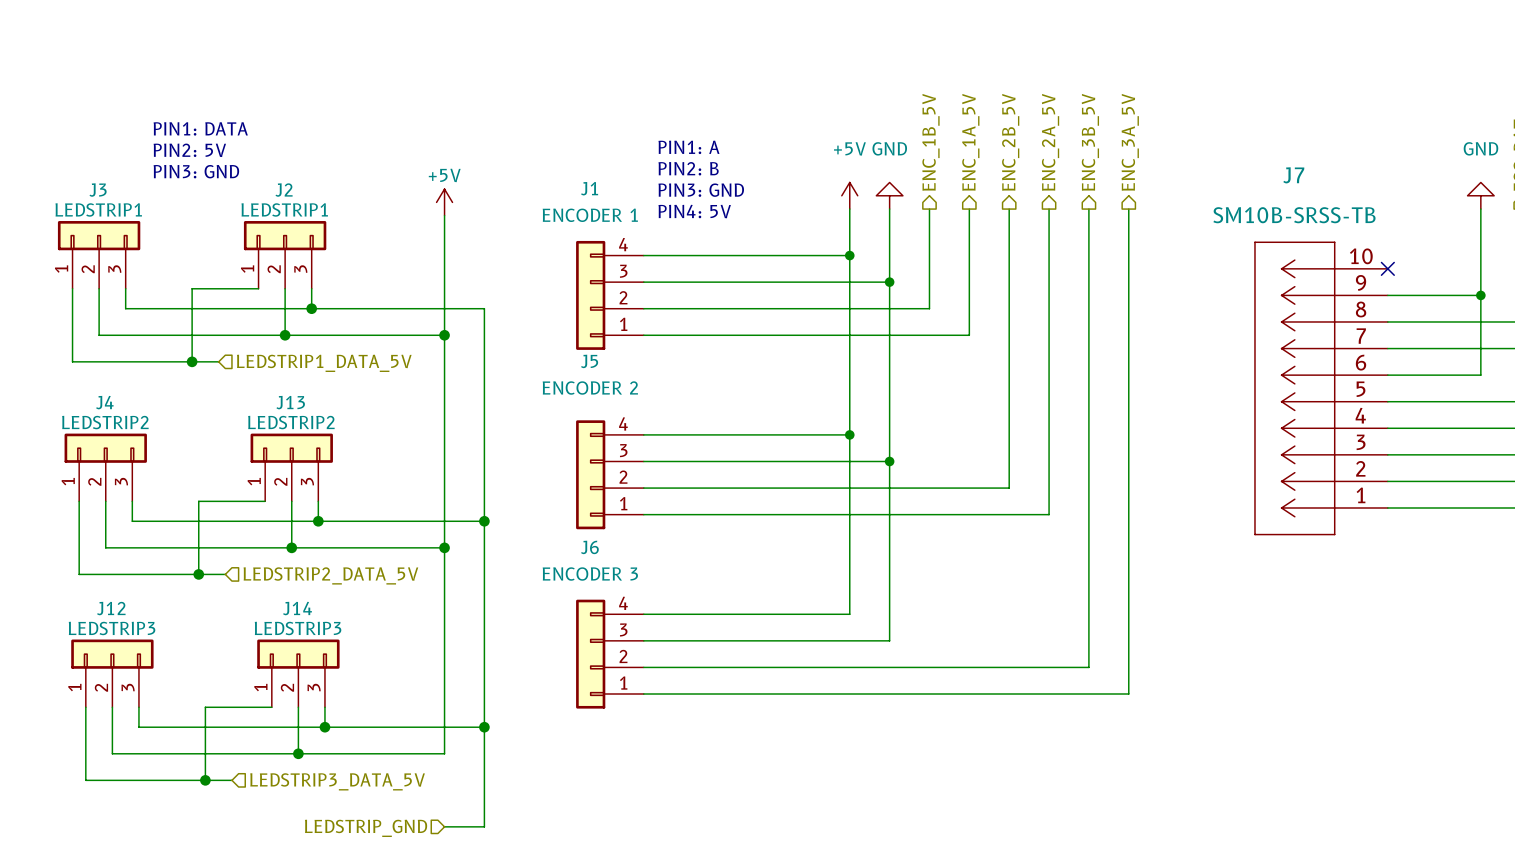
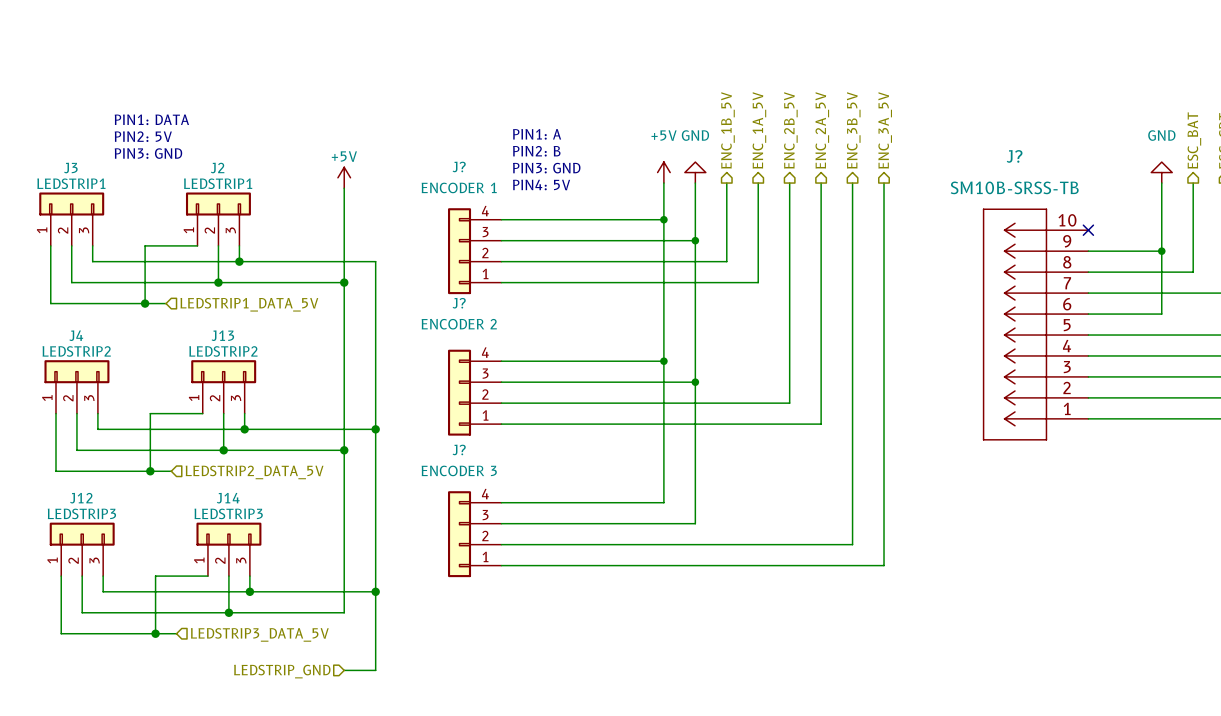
J7 name: J7 (1293, 175) -> J? (1014, 156)
J1 name: J1 (589, 188) -> J? (459, 166)
J5 name: J5 (589, 361) -> J? (459, 303)
J6 name: J6 (589, 547) -> J? (459, 449)

